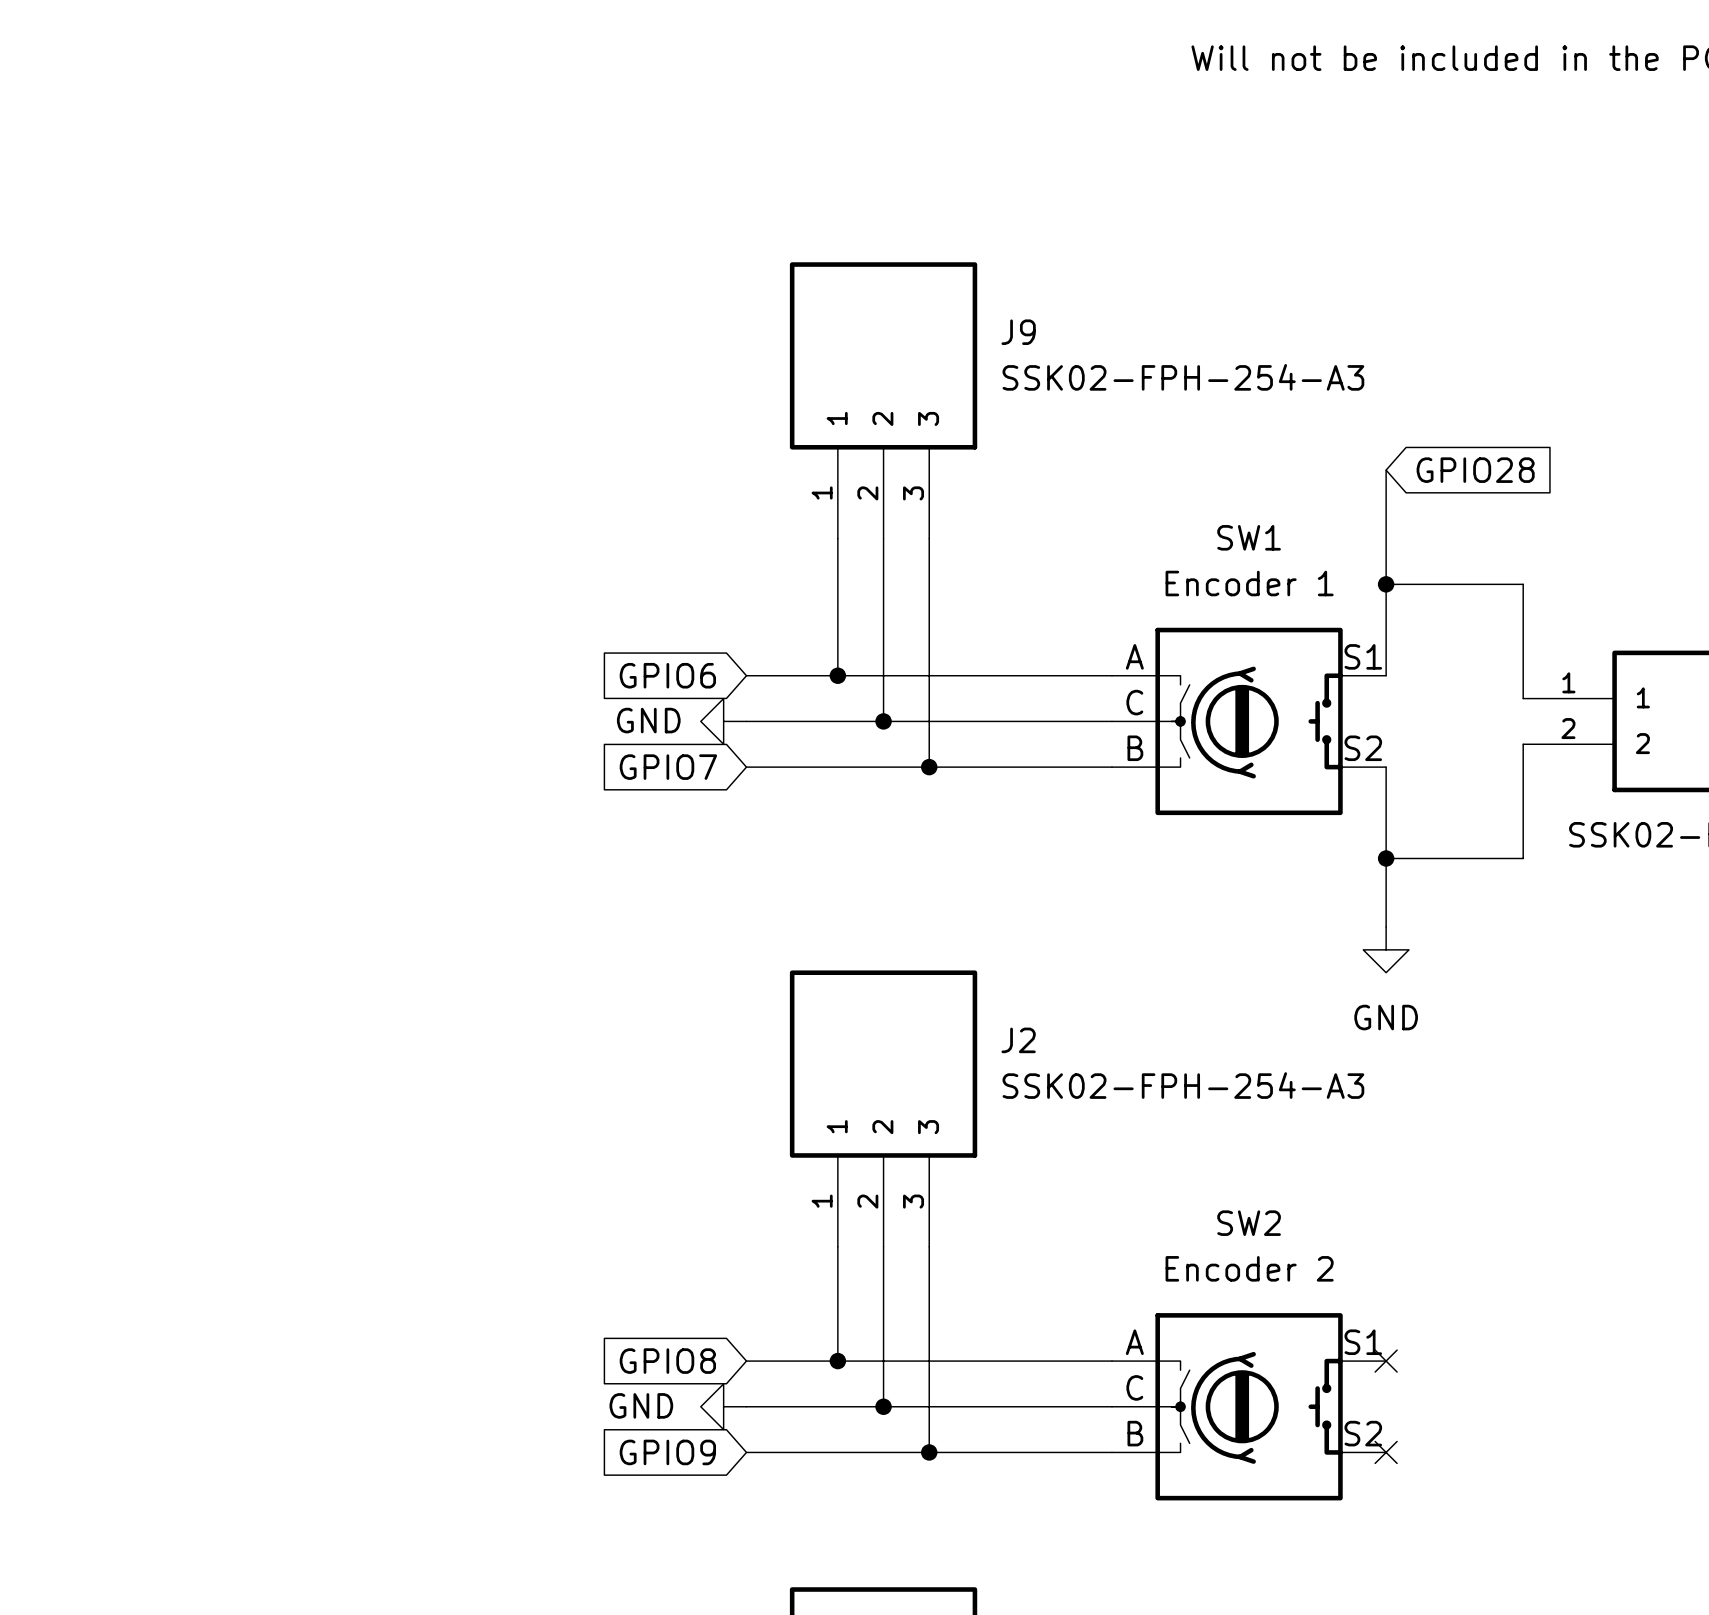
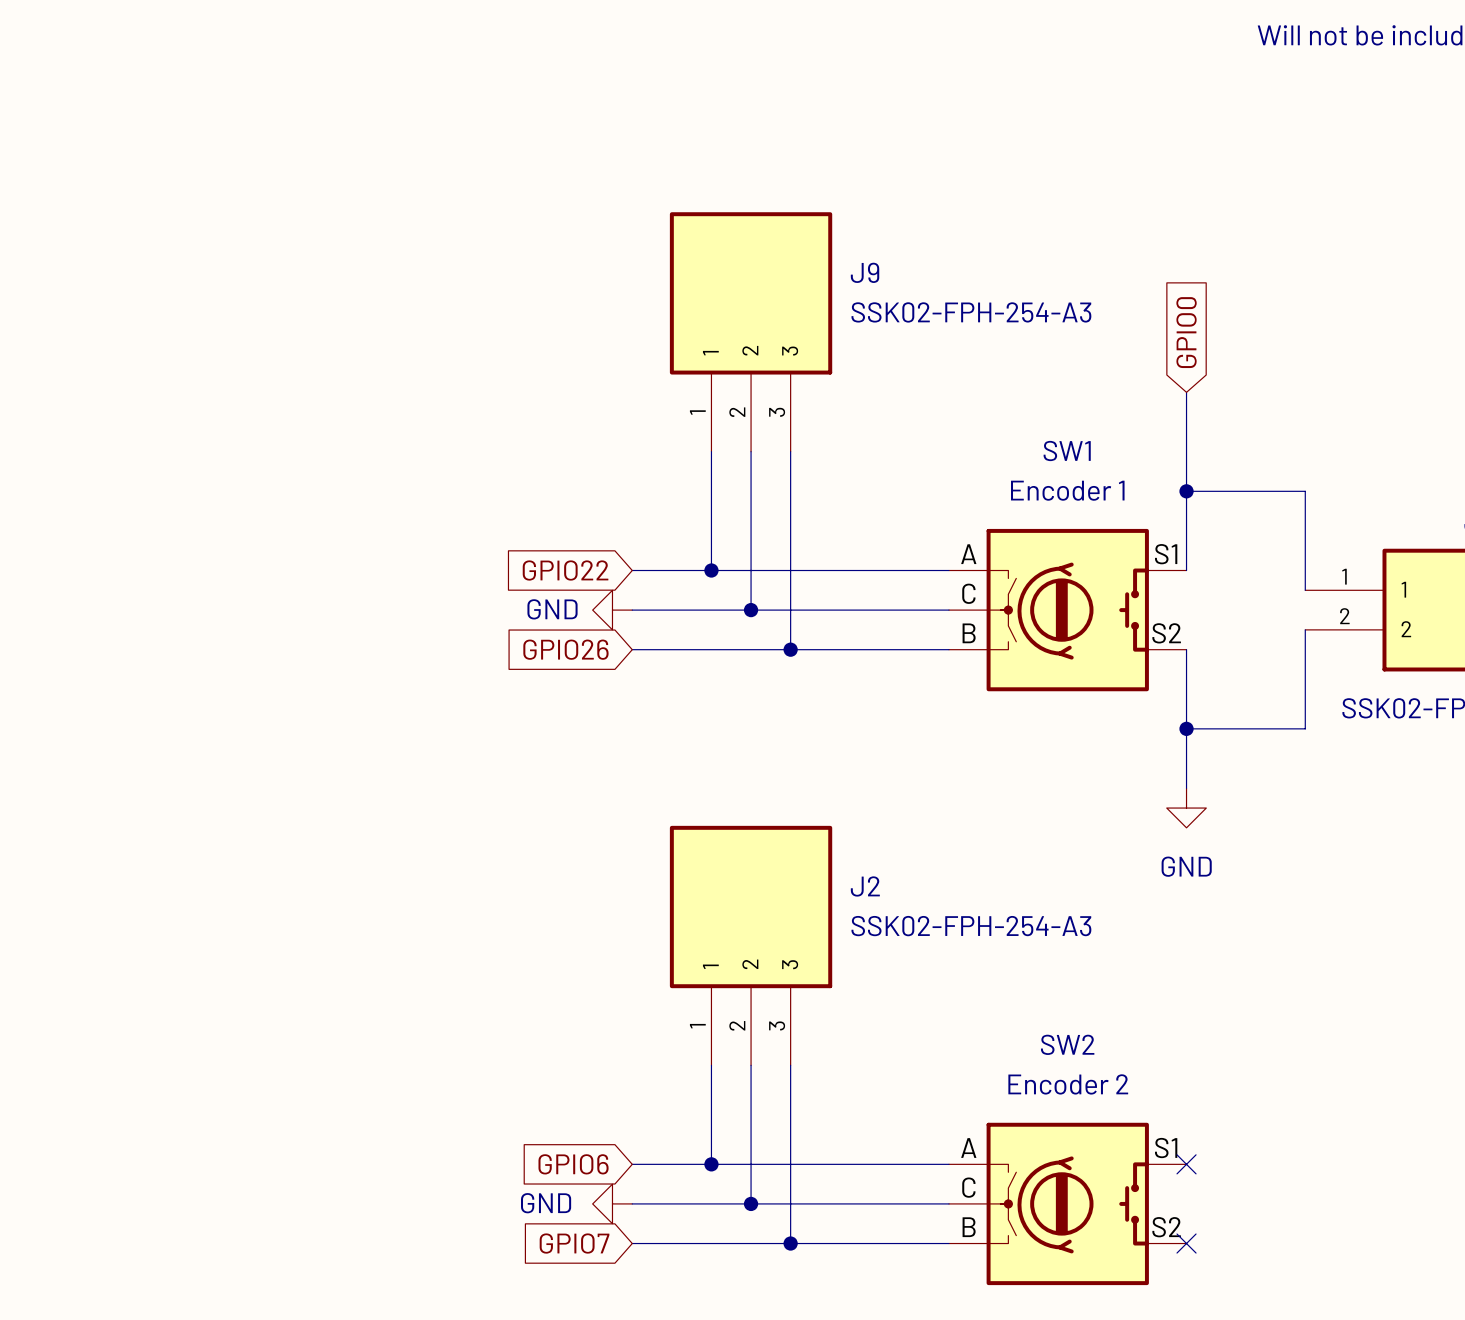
global label: GPIO28 (1475, 470) -> GPIO0 (1186, 332)
global label: GPIO6 (667, 675) -> GPIO22 (565, 570)
global label: GPIO7 (668, 767) -> GPIO26 (565, 649)
global label: GPIO8 (667, 1361) -> GPIO6 (573, 1164)
global label: GPIO9 (667, 1452) -> GPIO7 (574, 1243)

